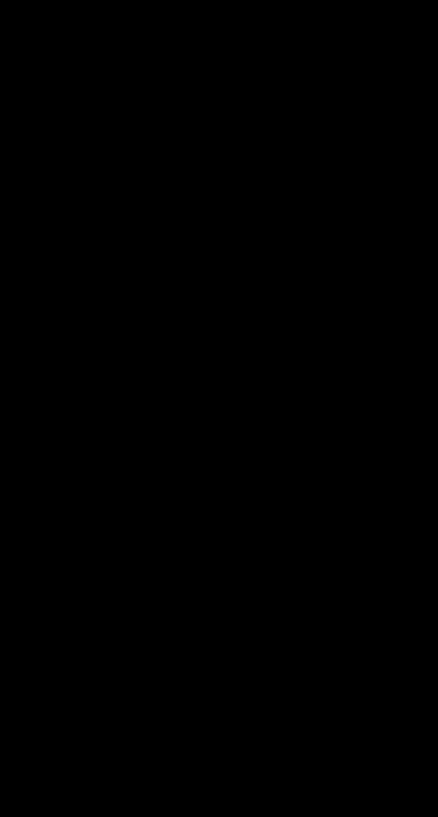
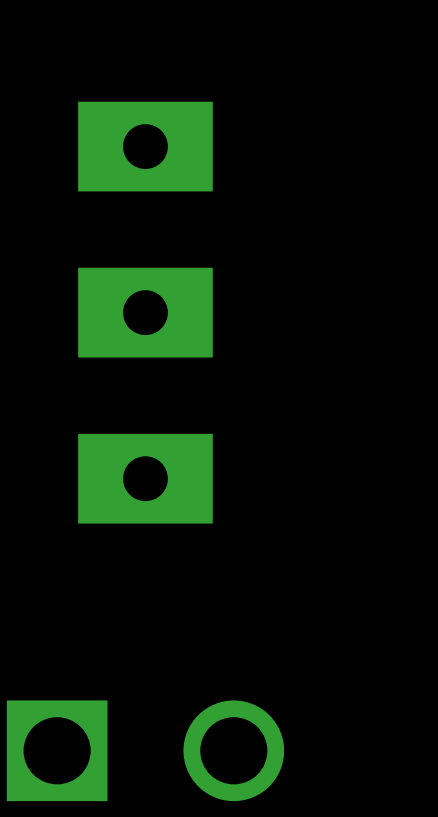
part: none -> (145, 312)
part: none -> (145, 750)

